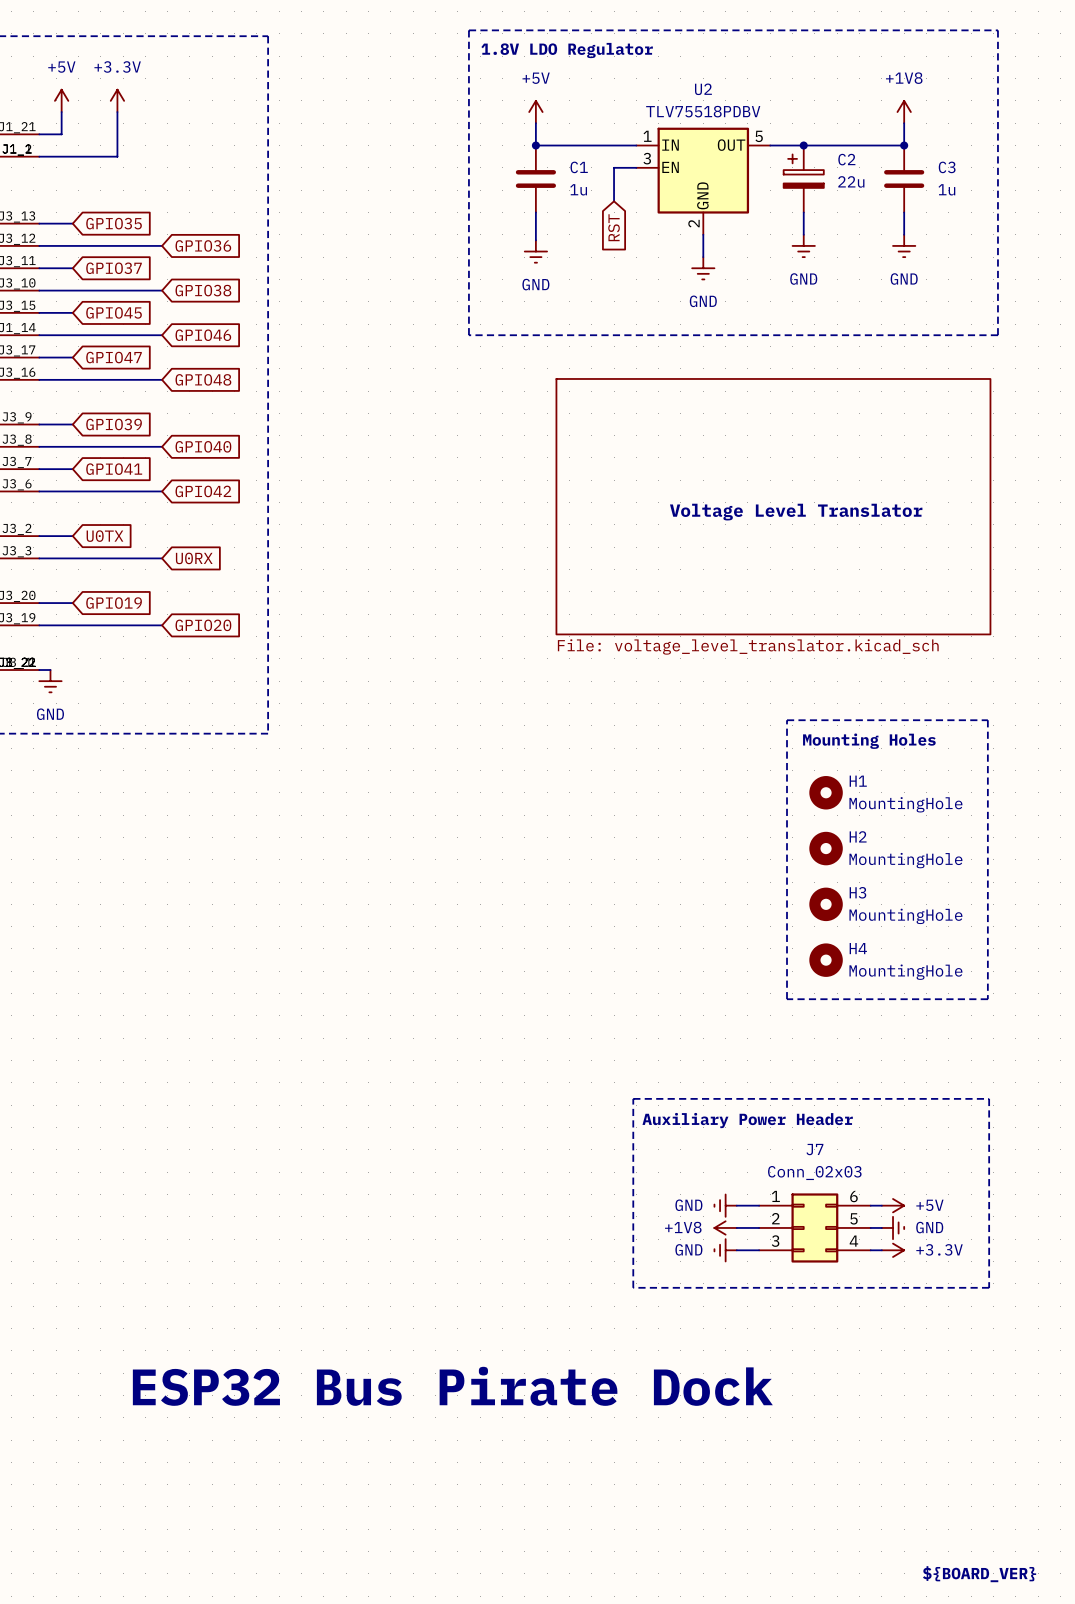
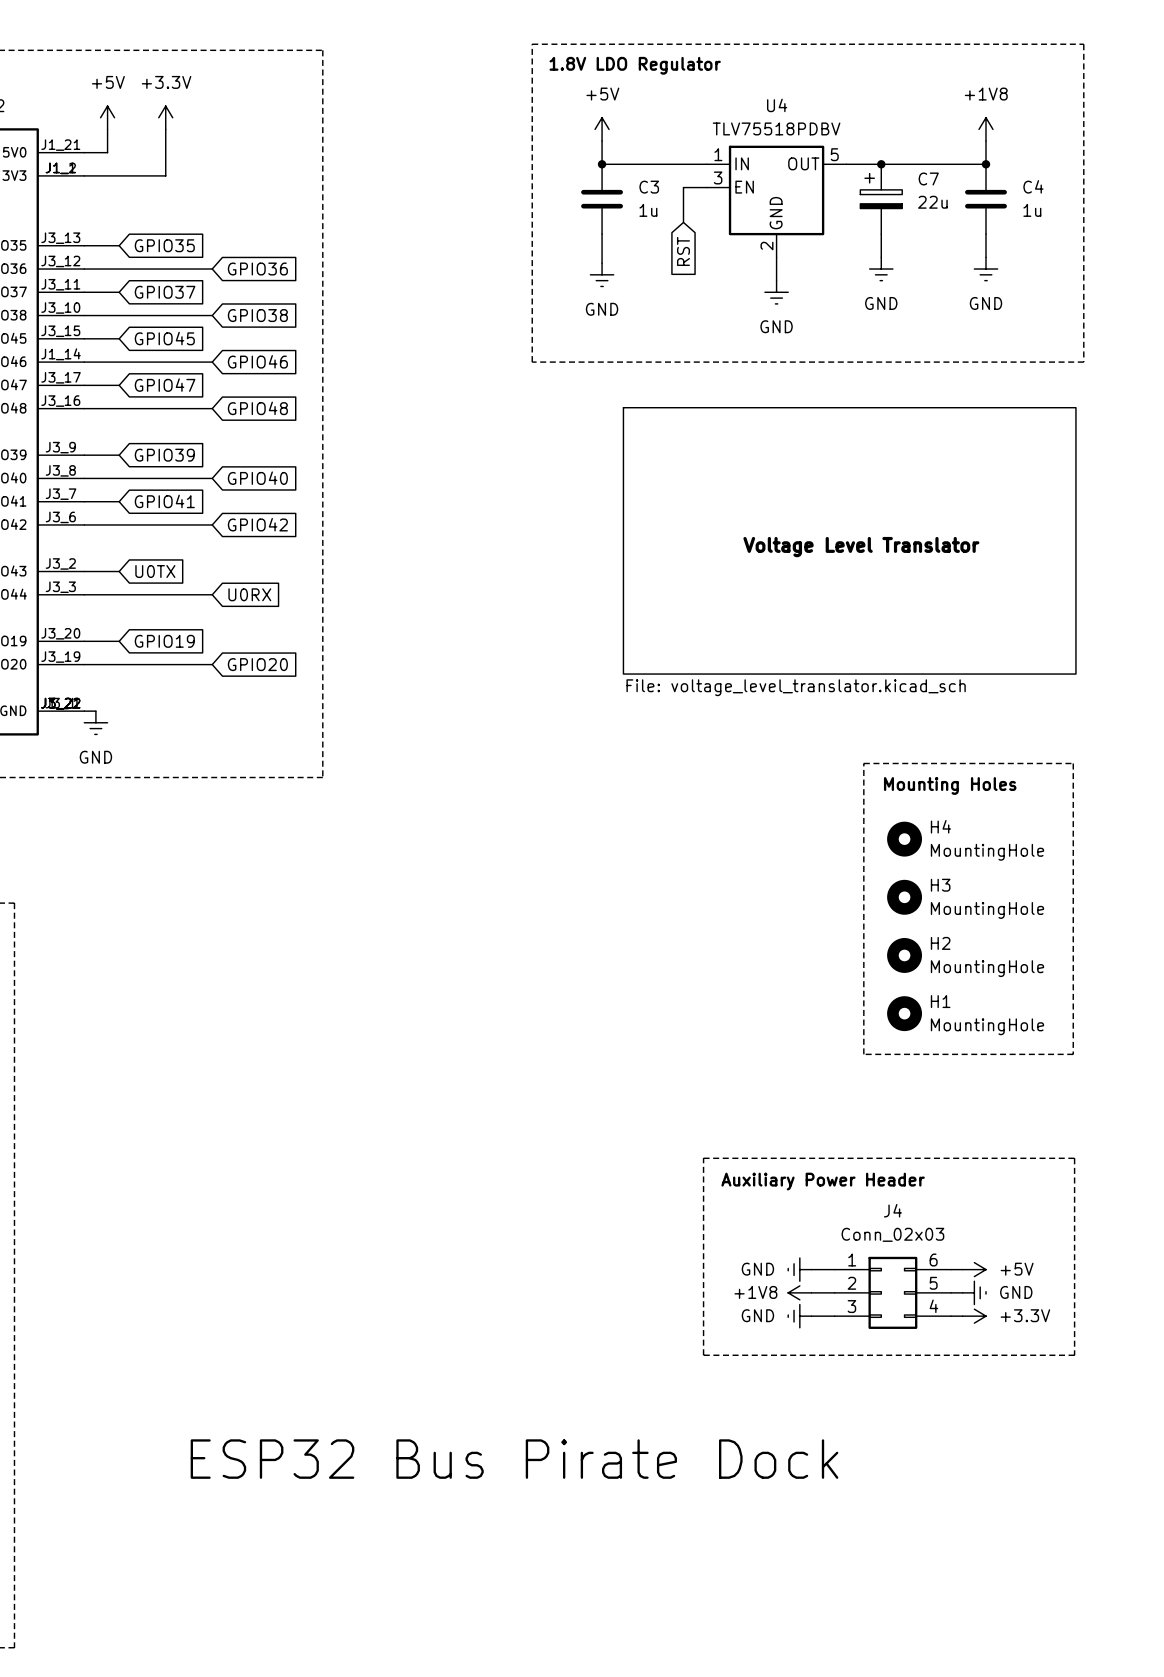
U2 name: U2 (703, 89) -> U4 (777, 105)
C2 name: C2 (846, 159) -> C7 (928, 178)
C1 name: C1 (579, 167) -> C3 (649, 187)
C3 name: C3 (947, 167) -> C4 (1033, 186)
H1 name: H1 (858, 781) -> H4 (940, 826)
H2 name: H2 (858, 836) -> H3 (940, 885)
H3 name: H3 (857, 892) -> H2 (940, 943)
H4 name: H4 (858, 948) -> H1 (940, 1001)
J7 name: J7 (814, 1149) -> J4 (892, 1210)
text: ${BOARD_VER} (979, 1574) -> none

